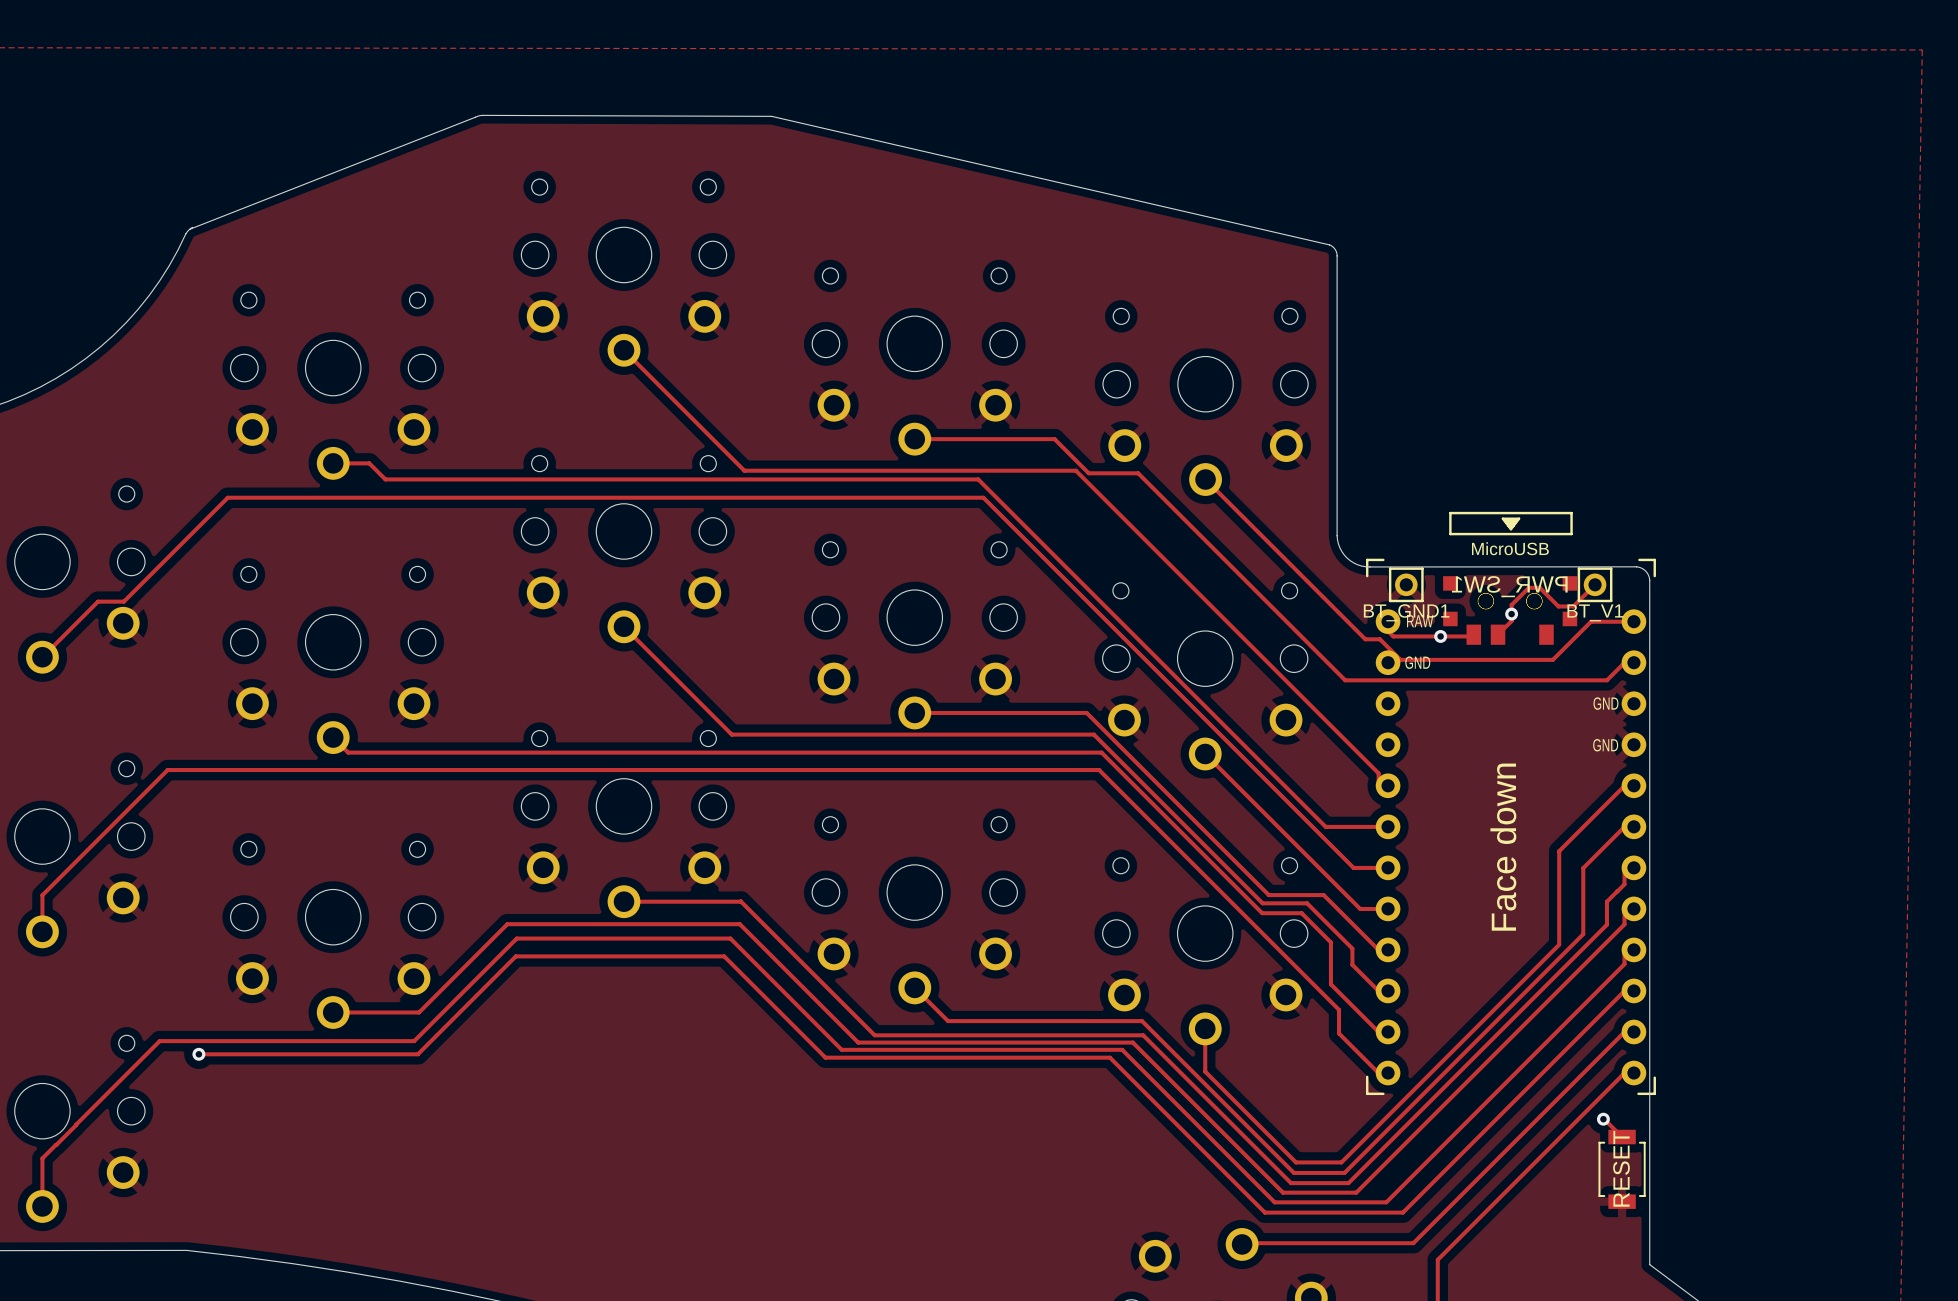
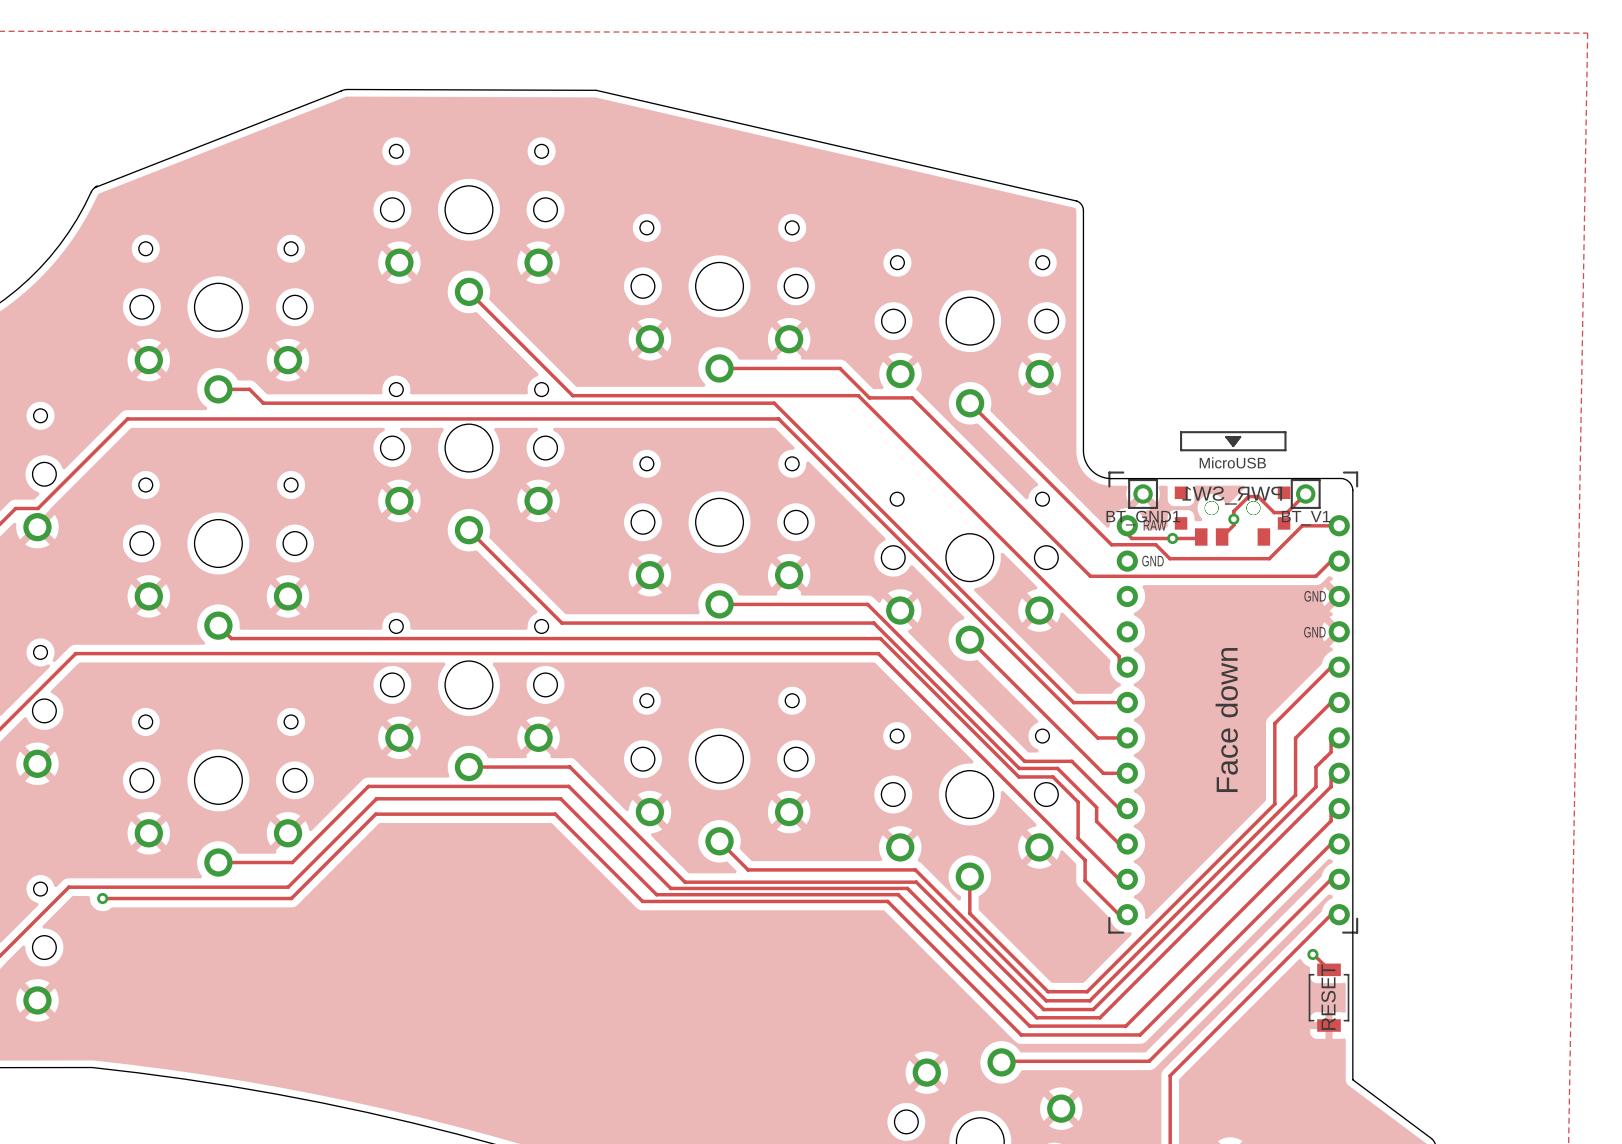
track: (1365, 639) (1379, 639) (1400, 659) (1437, 659) -> (1107, 540) (1111, 544) (1155, 544) (1169, 558)

